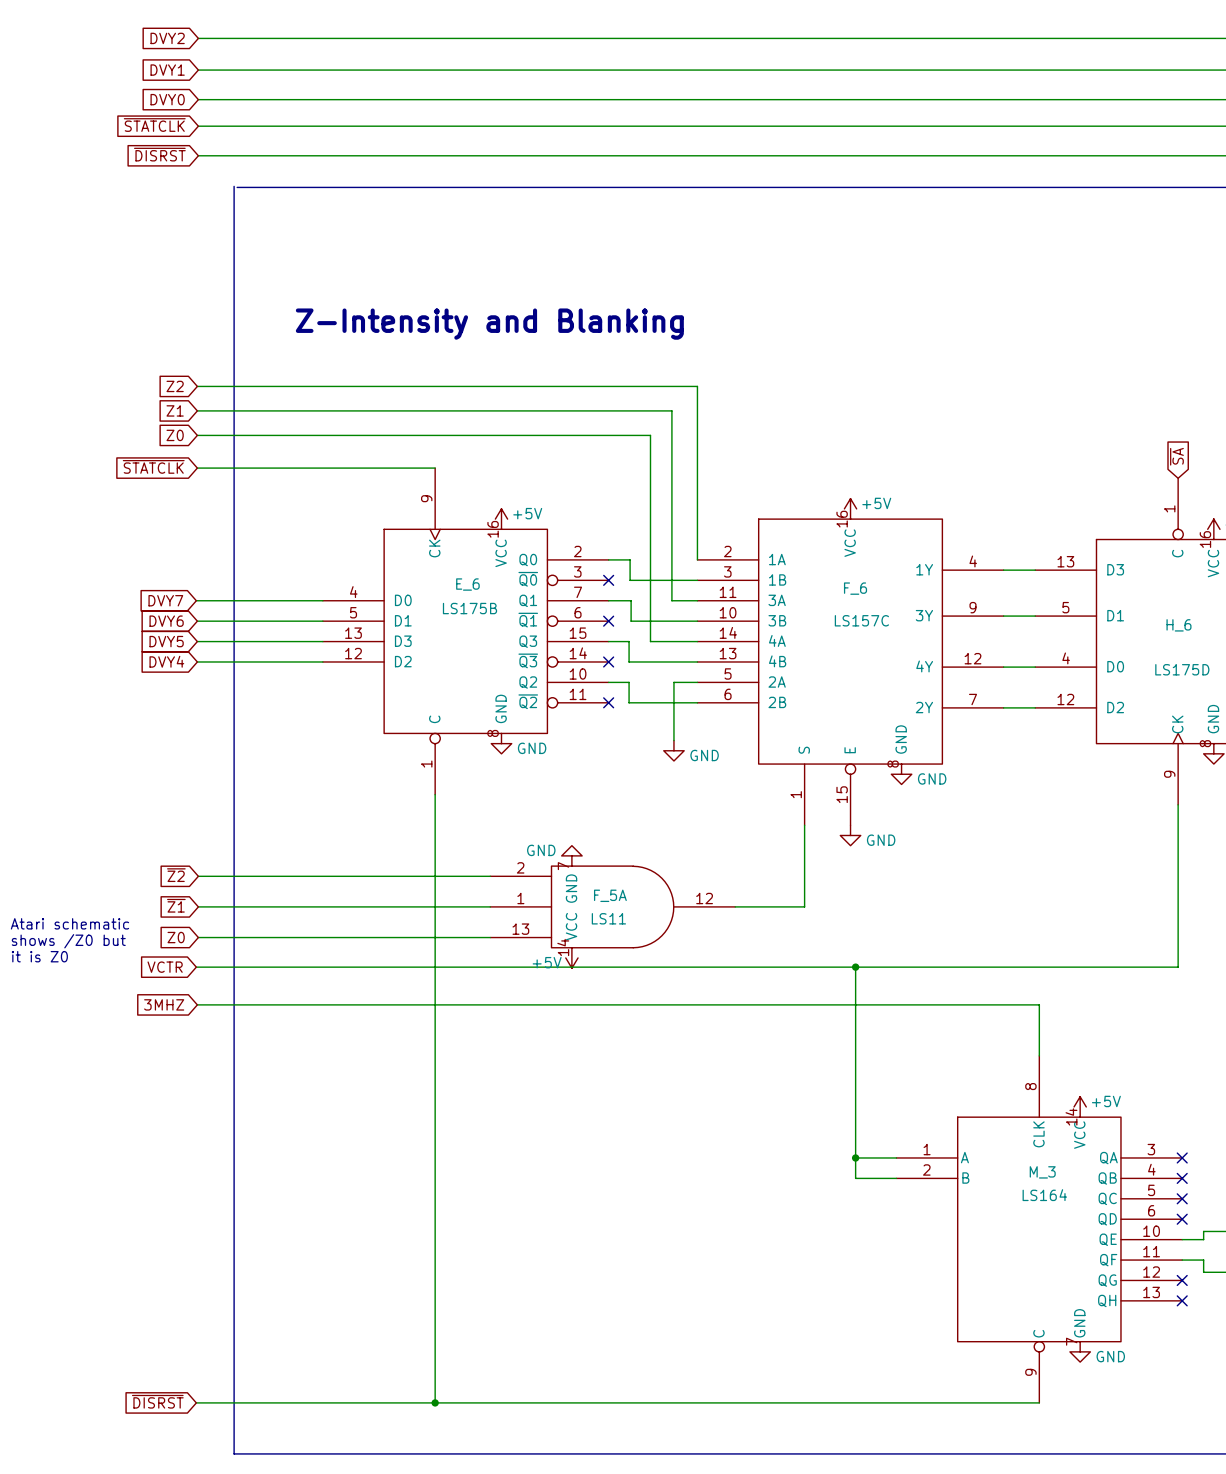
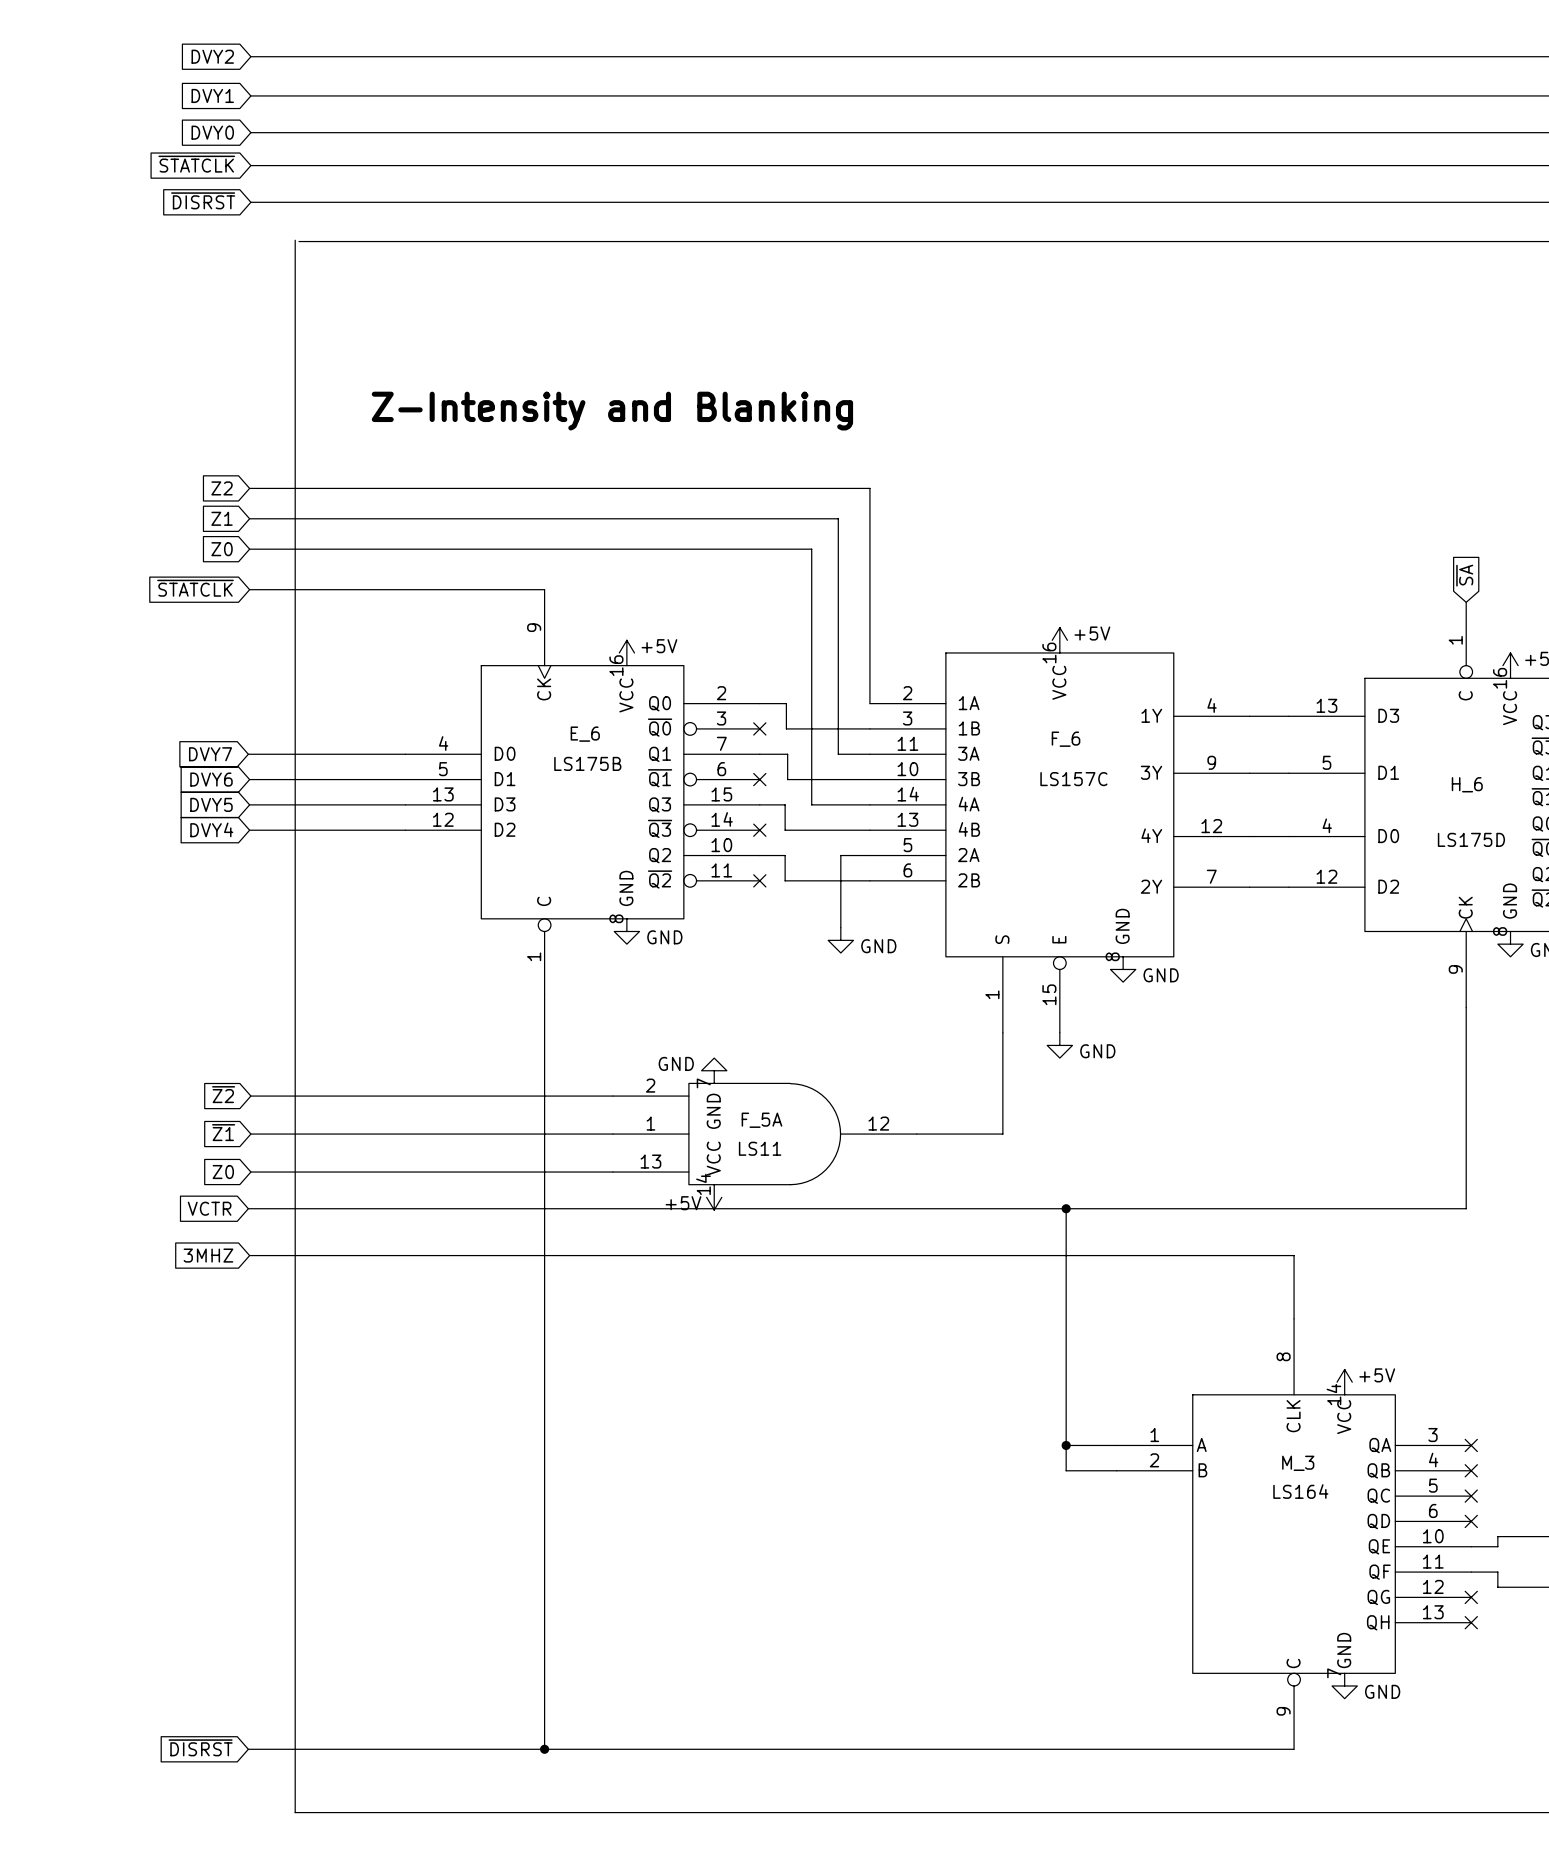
text: Atari schematic (69, 923) -> none
text: shows /Z0 but (68, 941) -> none
text: it is Z0 (39, 956) -> none

